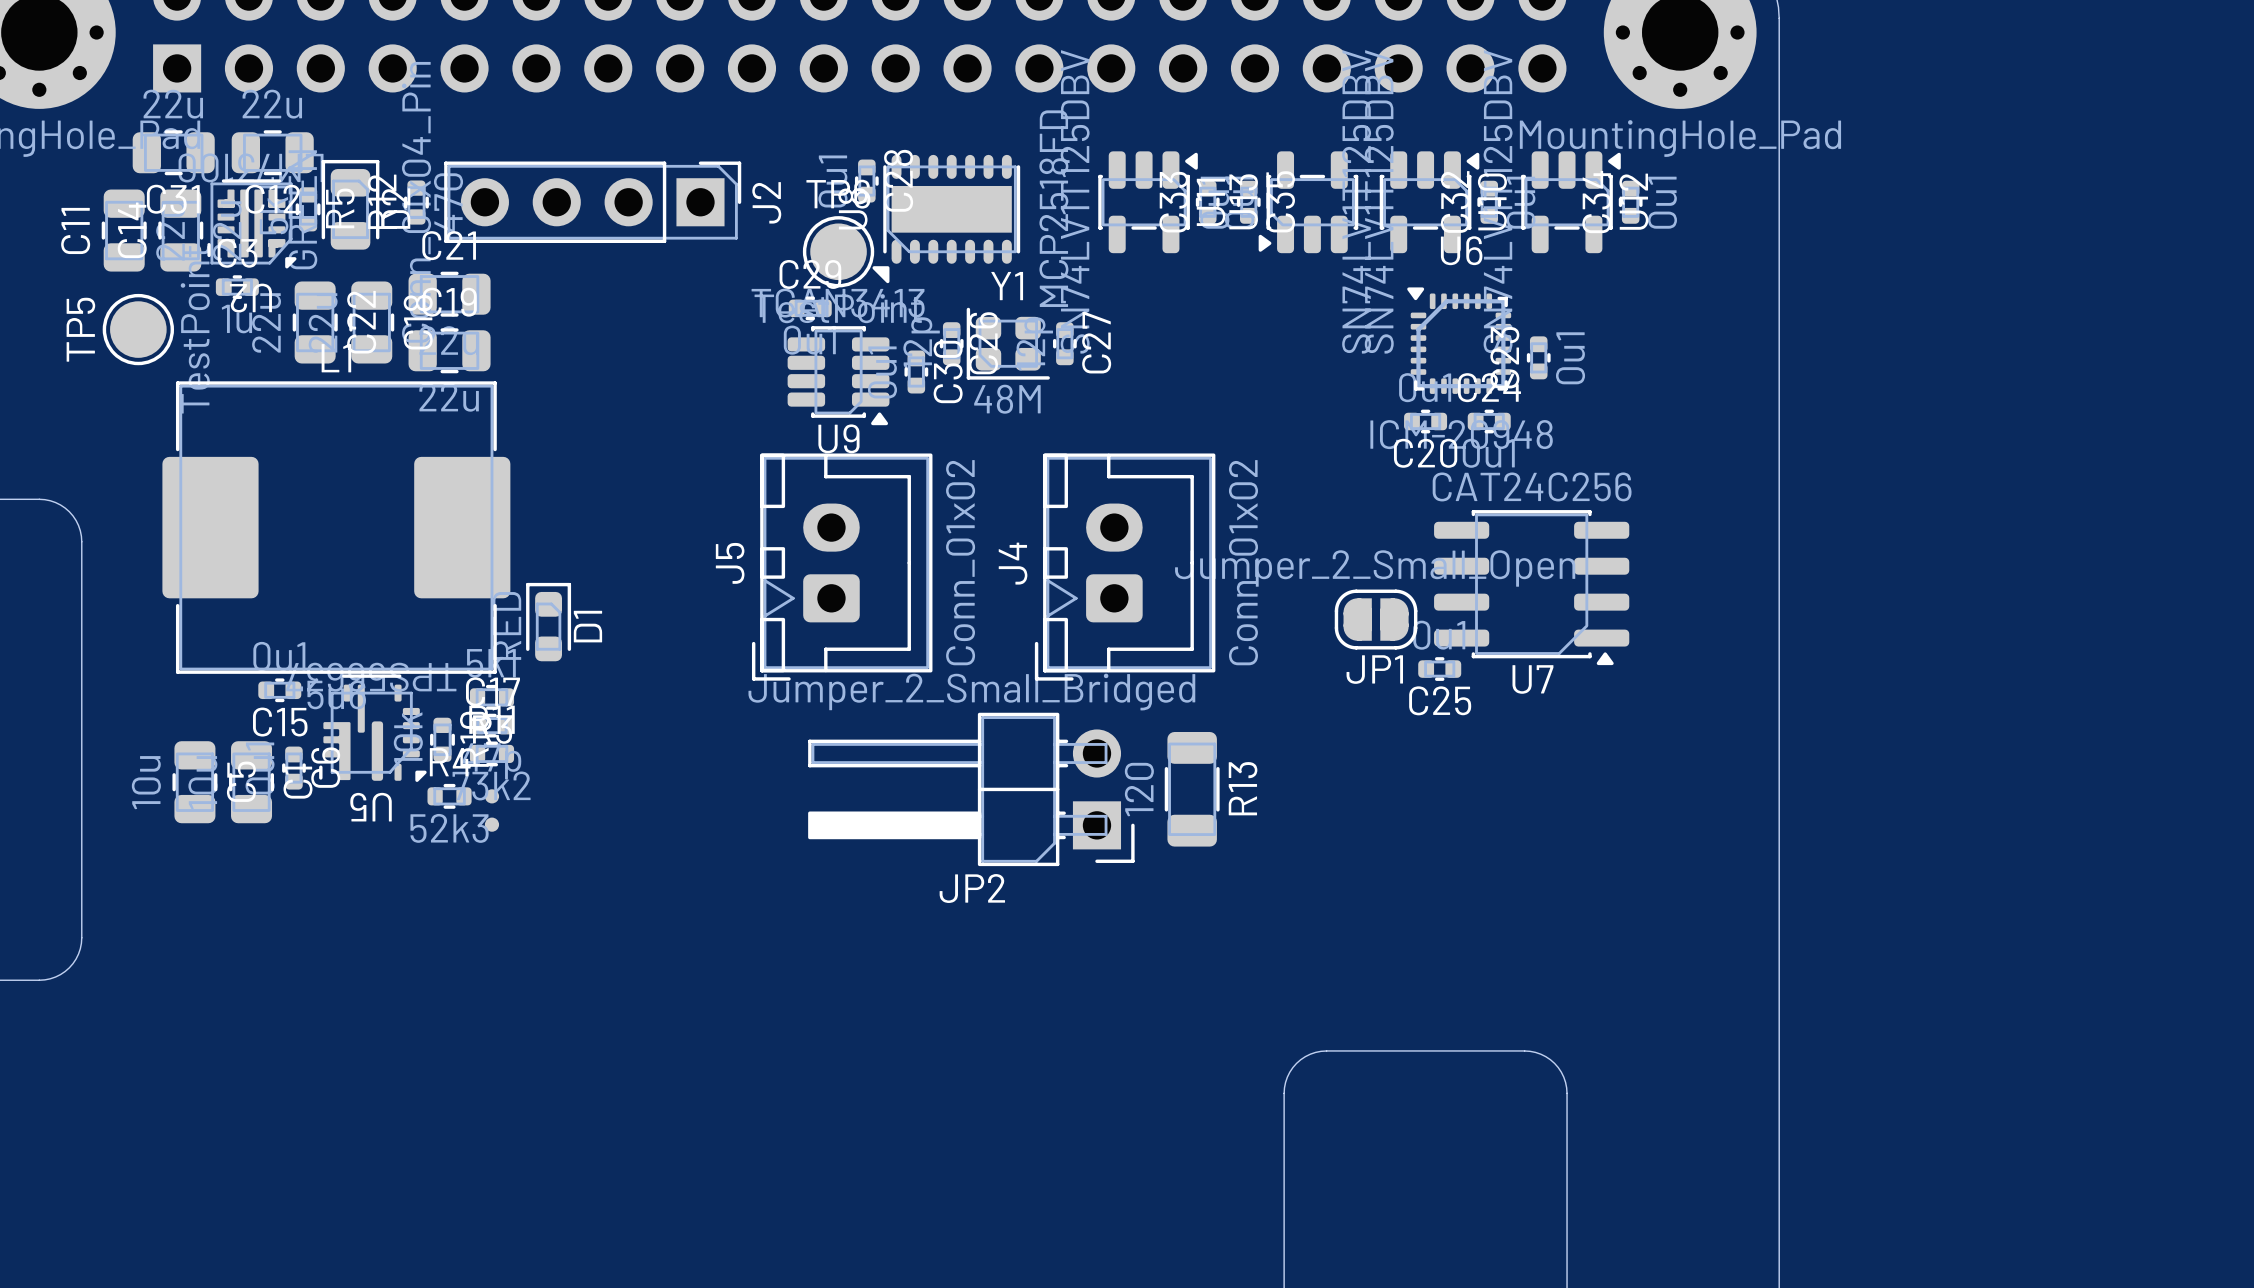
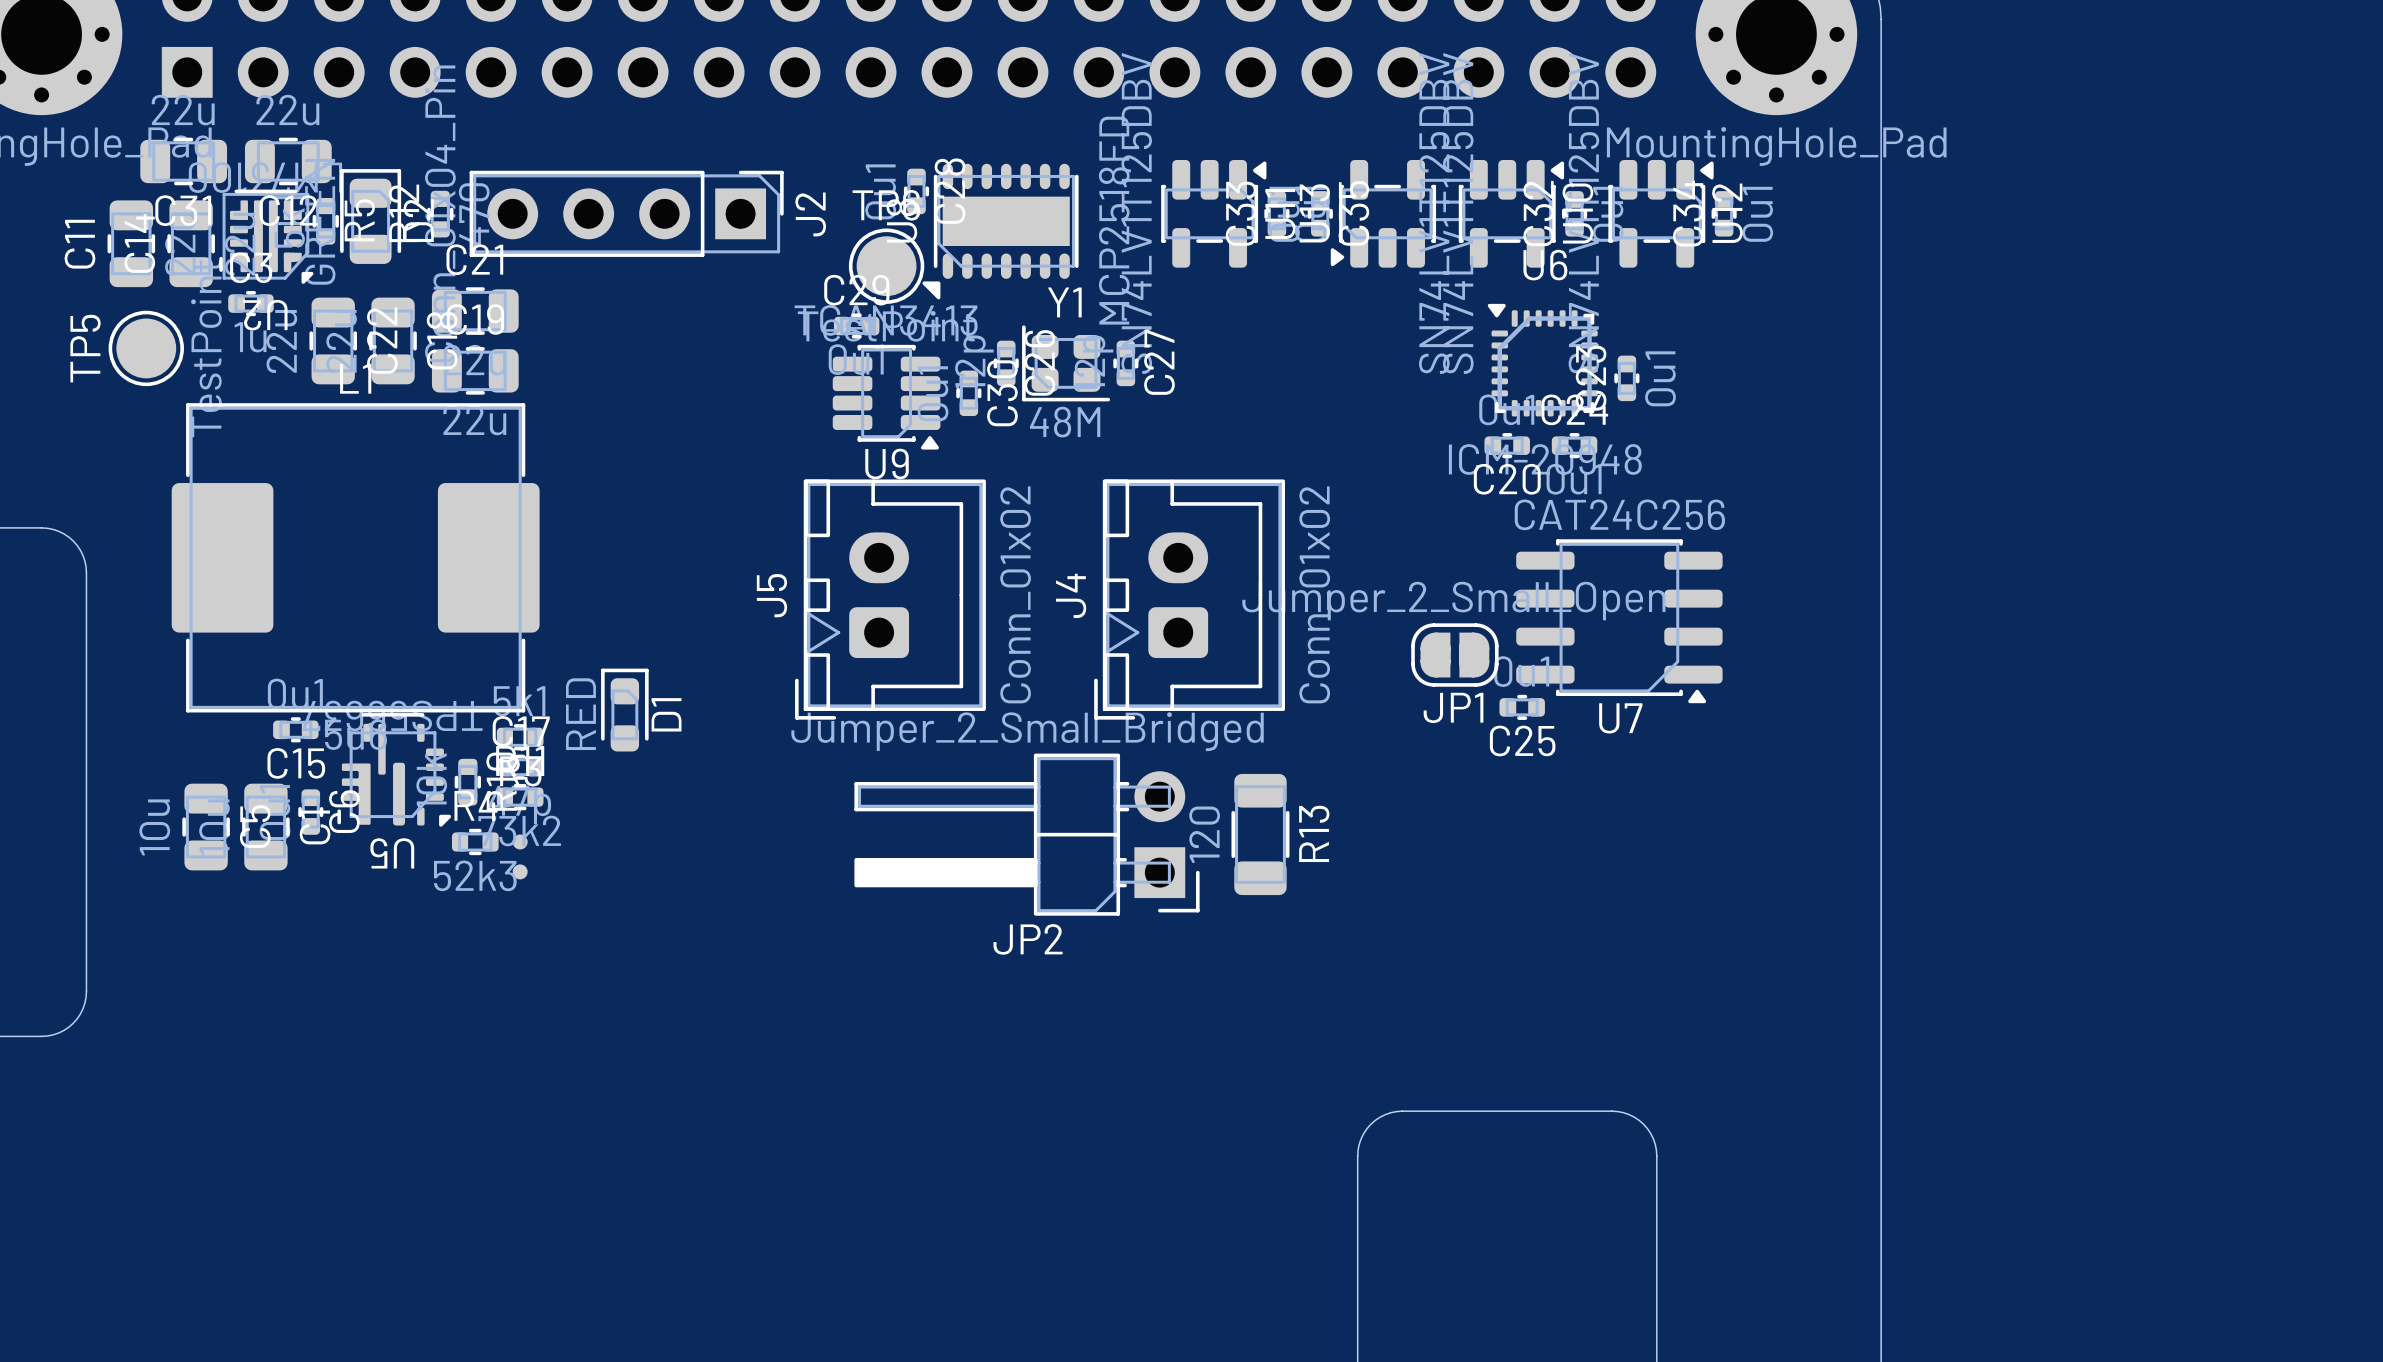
D1 position: (548, 622) -> (624, 710)

